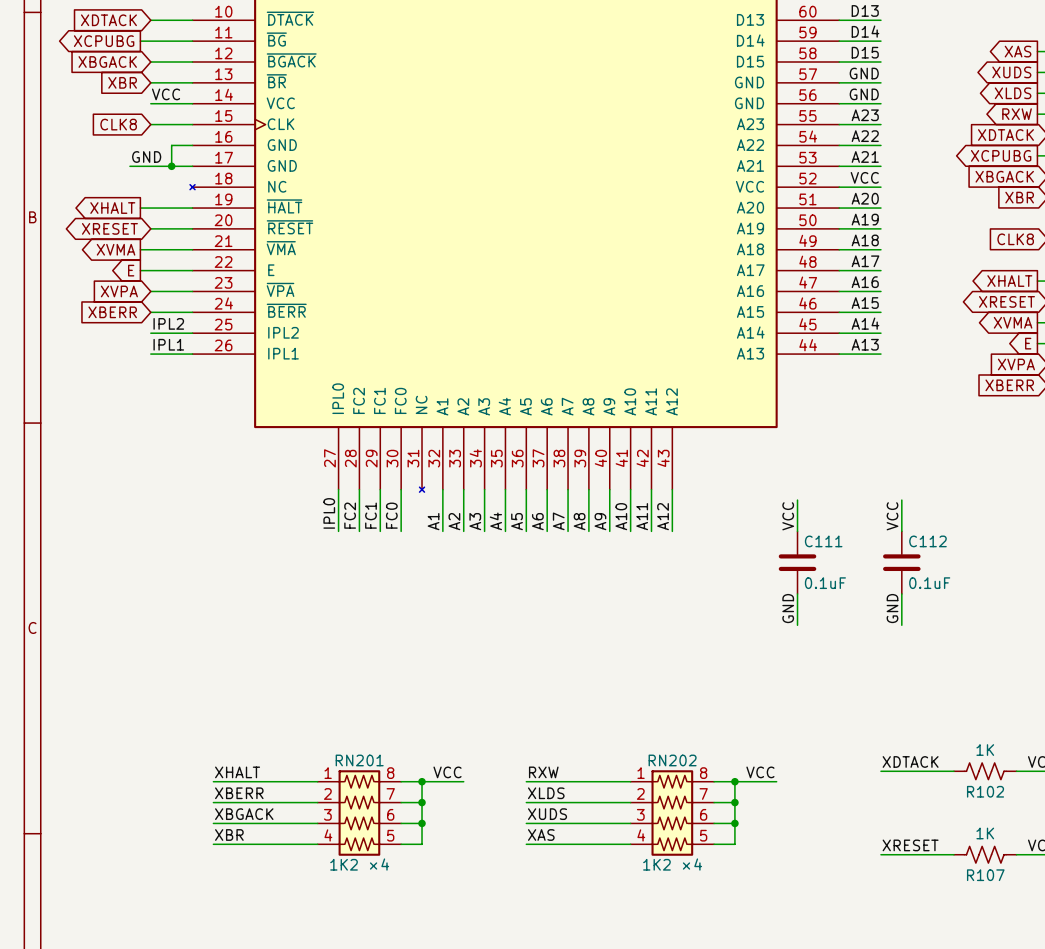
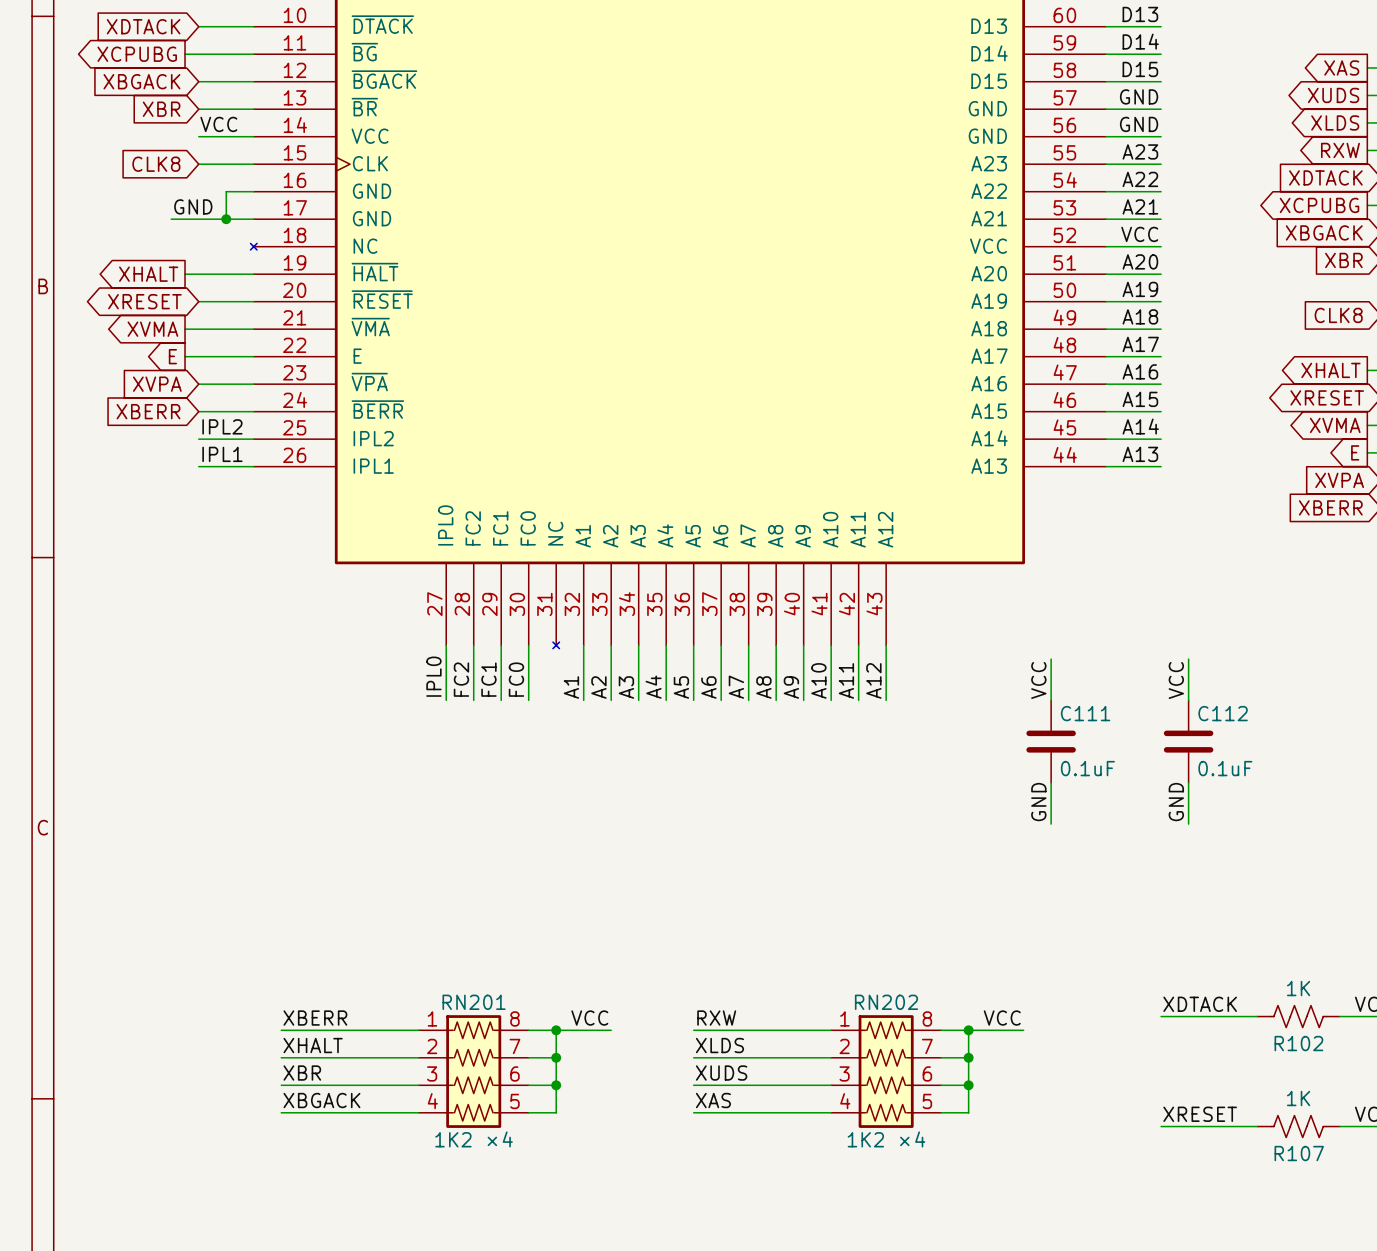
label: XHALT (237, 772) -> XBERR (315, 1018)
label: XBERR (239, 793) -> XHALT (313, 1045)
label: XBGACK (244, 814) -> XBR (302, 1073)
label: XBR (229, 834) -> XBGACK (321, 1100)

